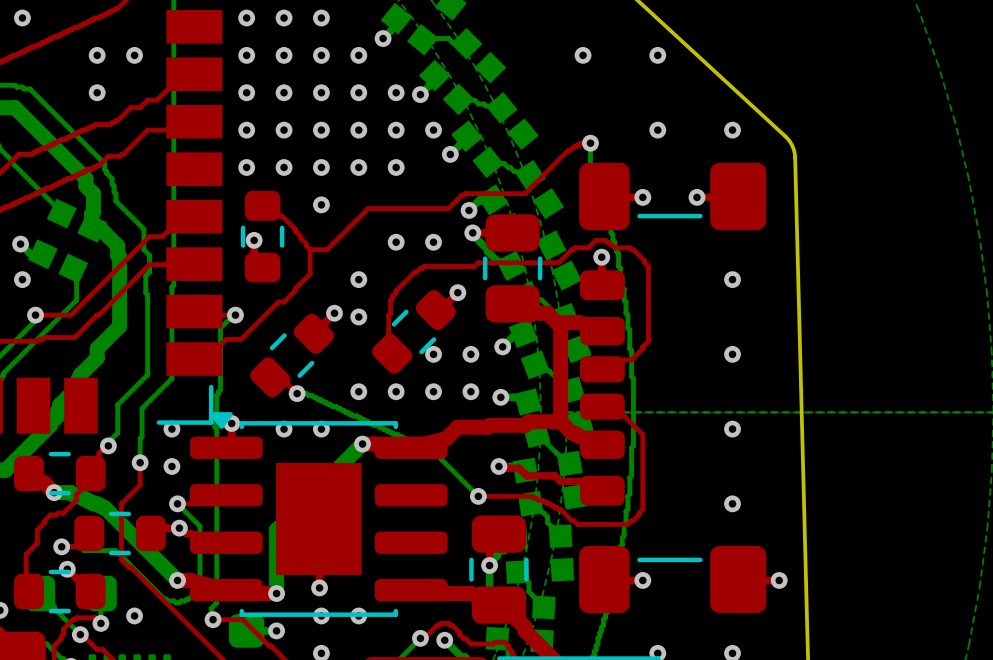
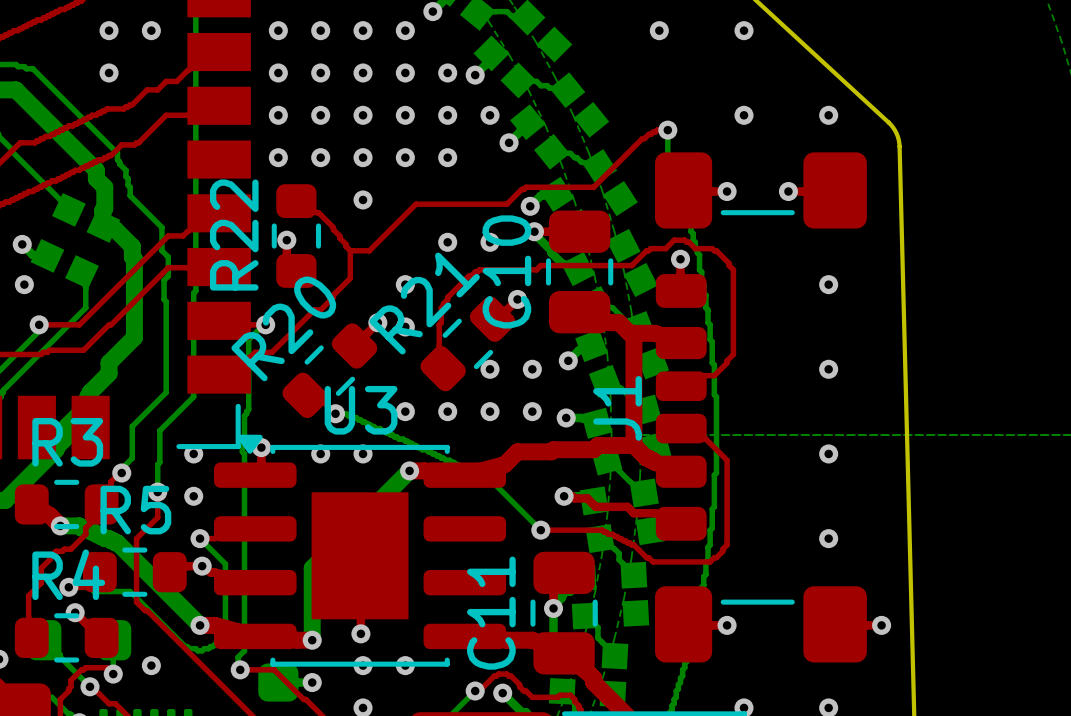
R22 name: none -> R22 (234, 235)
C10 name: none -> C10 (506, 271)
R21 name: none -> R21 (424, 303)
R20 name: none -> R20 (283, 328)
J1 name: none -> J1 (617, 408)
U3 name: none -> U3 (361, 410)
R3 name: none -> R3 (67, 442)
R5 name: none -> R5 (135, 510)
R4 name: none -> R4 (68, 574)
C11 name: none -> C11 (491, 613)

